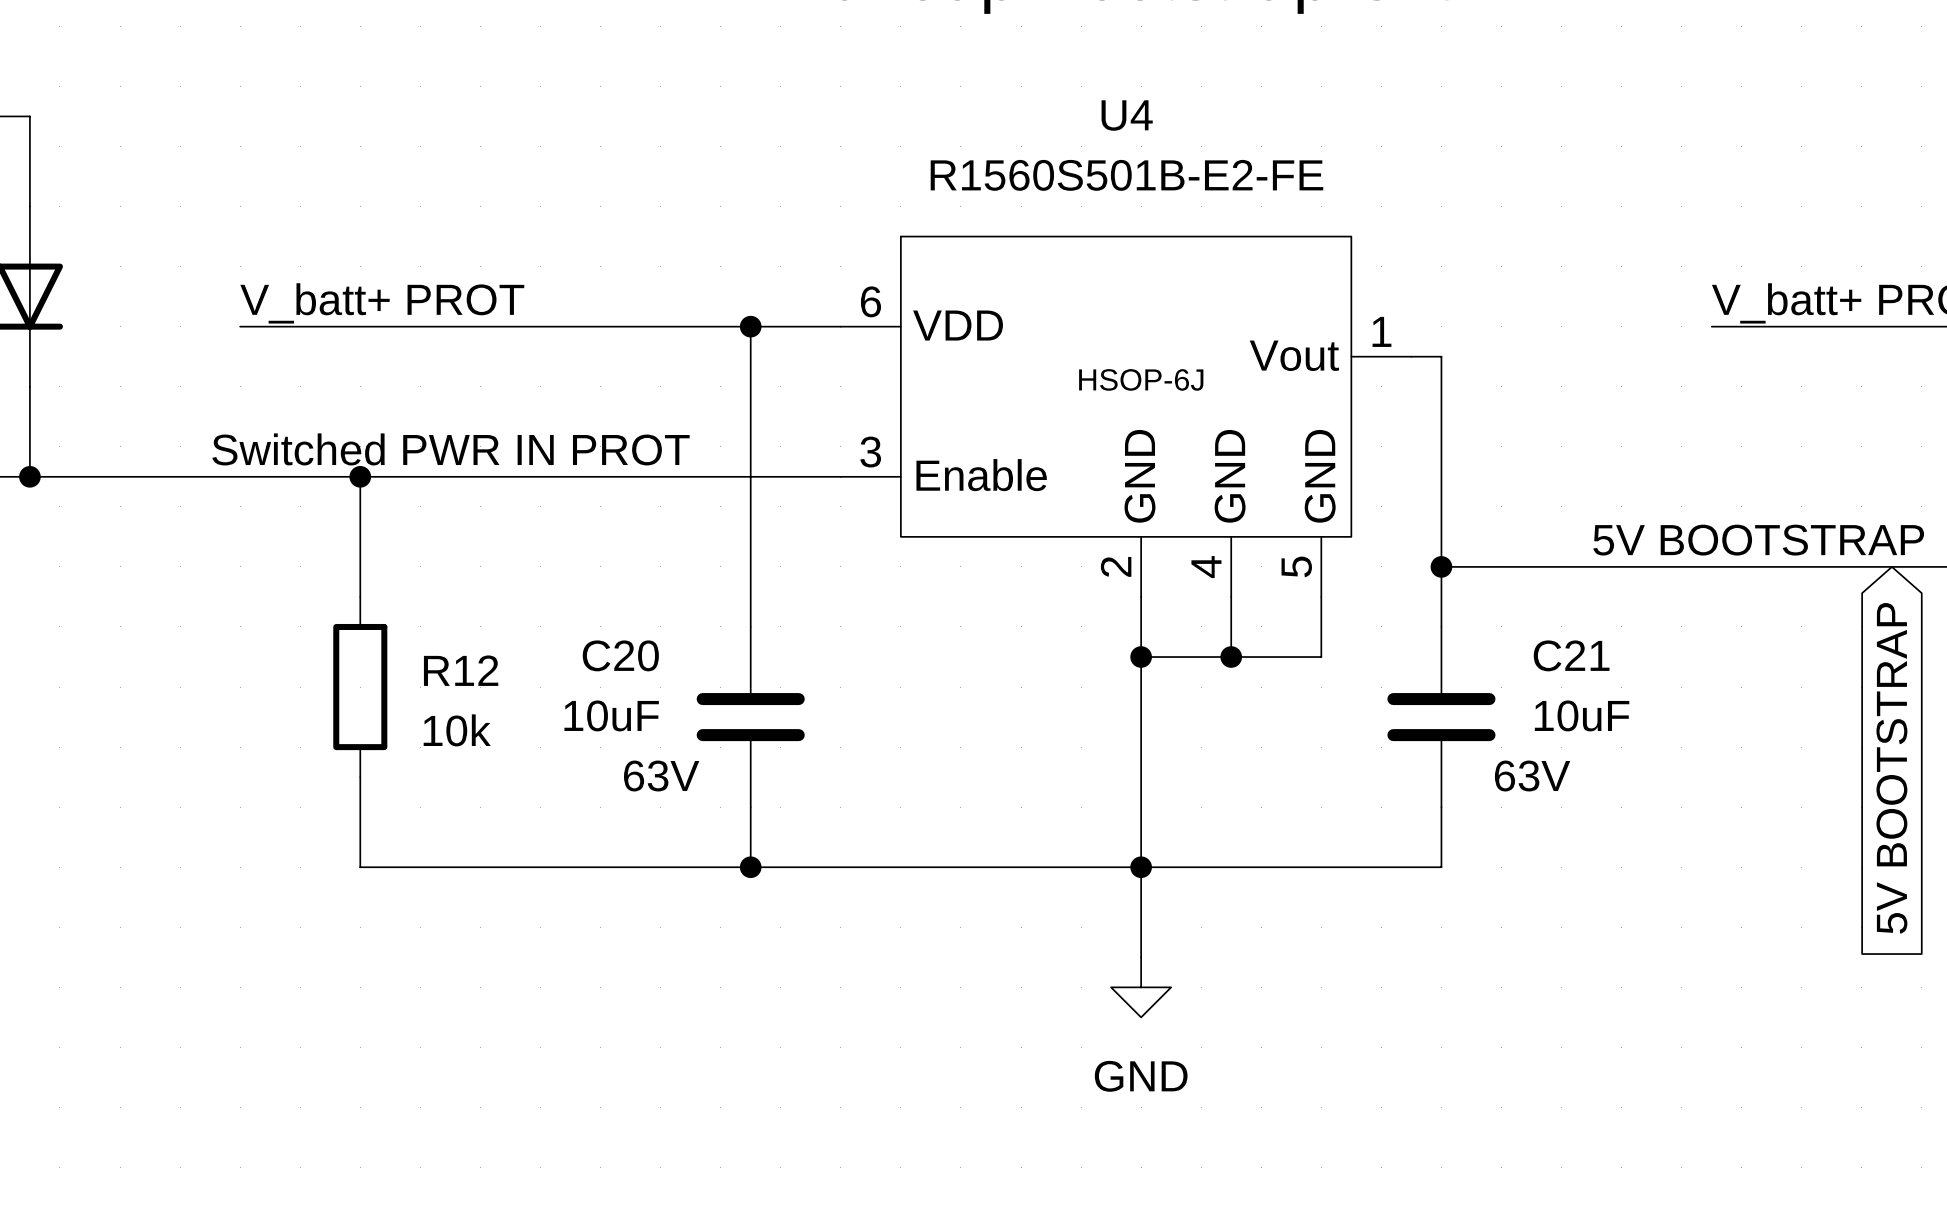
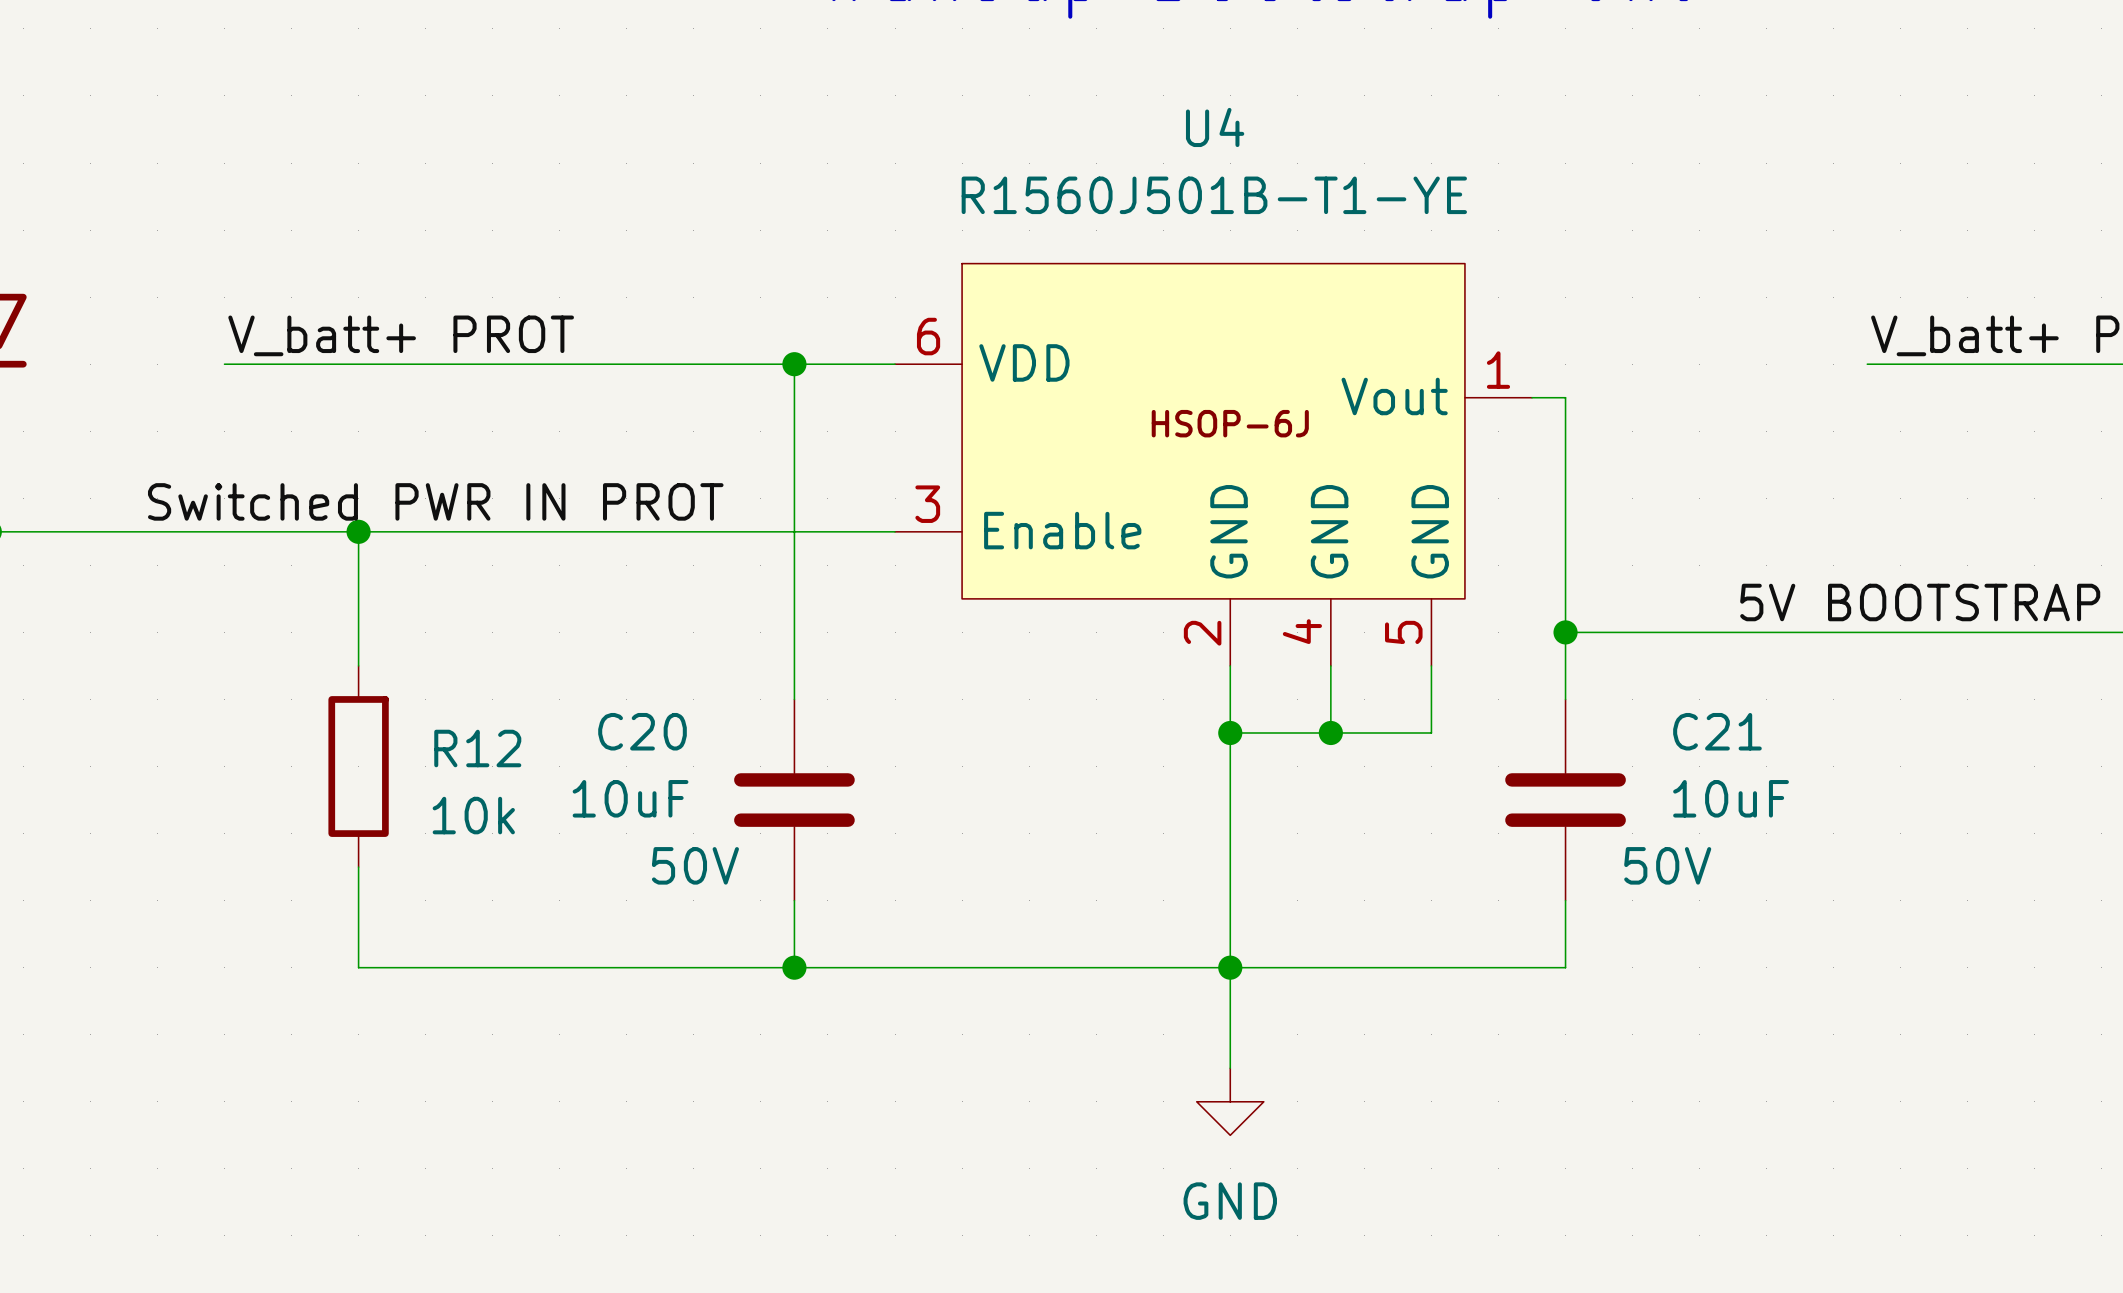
U4 value: R1560S501B-E2-FE (1126, 175) -> R1560J501B-T1-YE (1214, 195)
global label: 5V BOOTSTRAP (1891, 768) -> none
C20 text: 63V (661, 776) -> 50V (695, 865)
C21 text: 63V (1532, 776) -> 50V (1667, 865)

